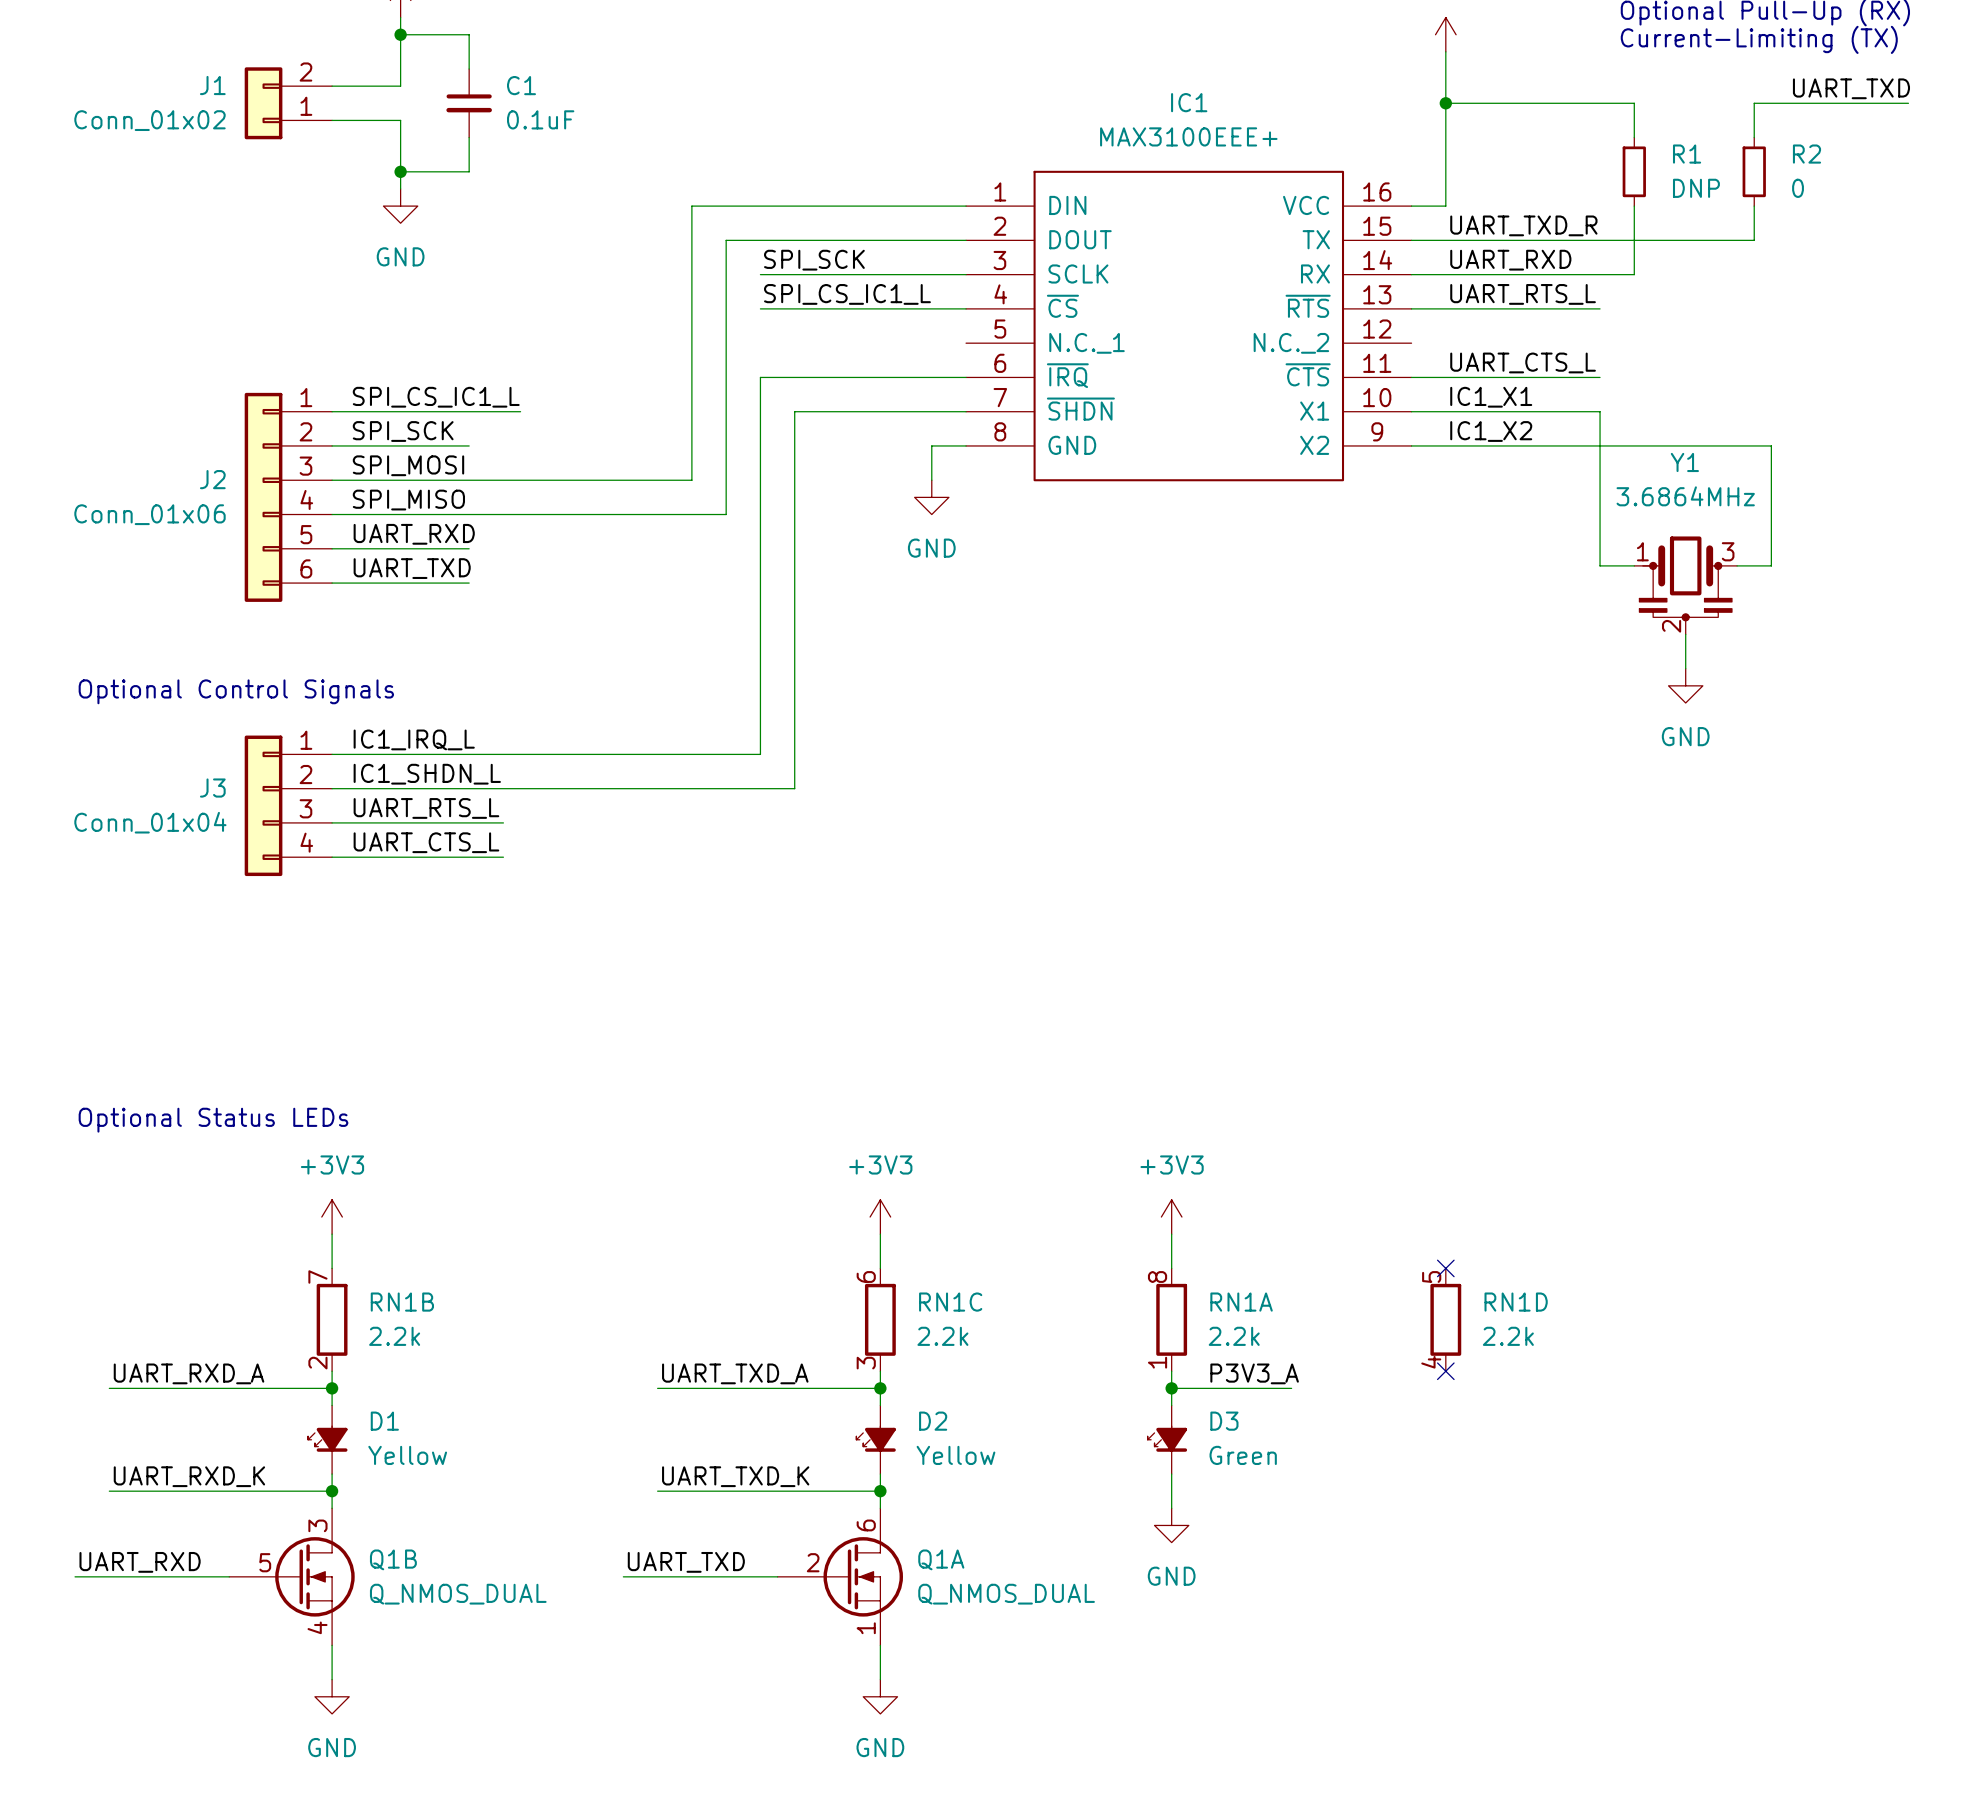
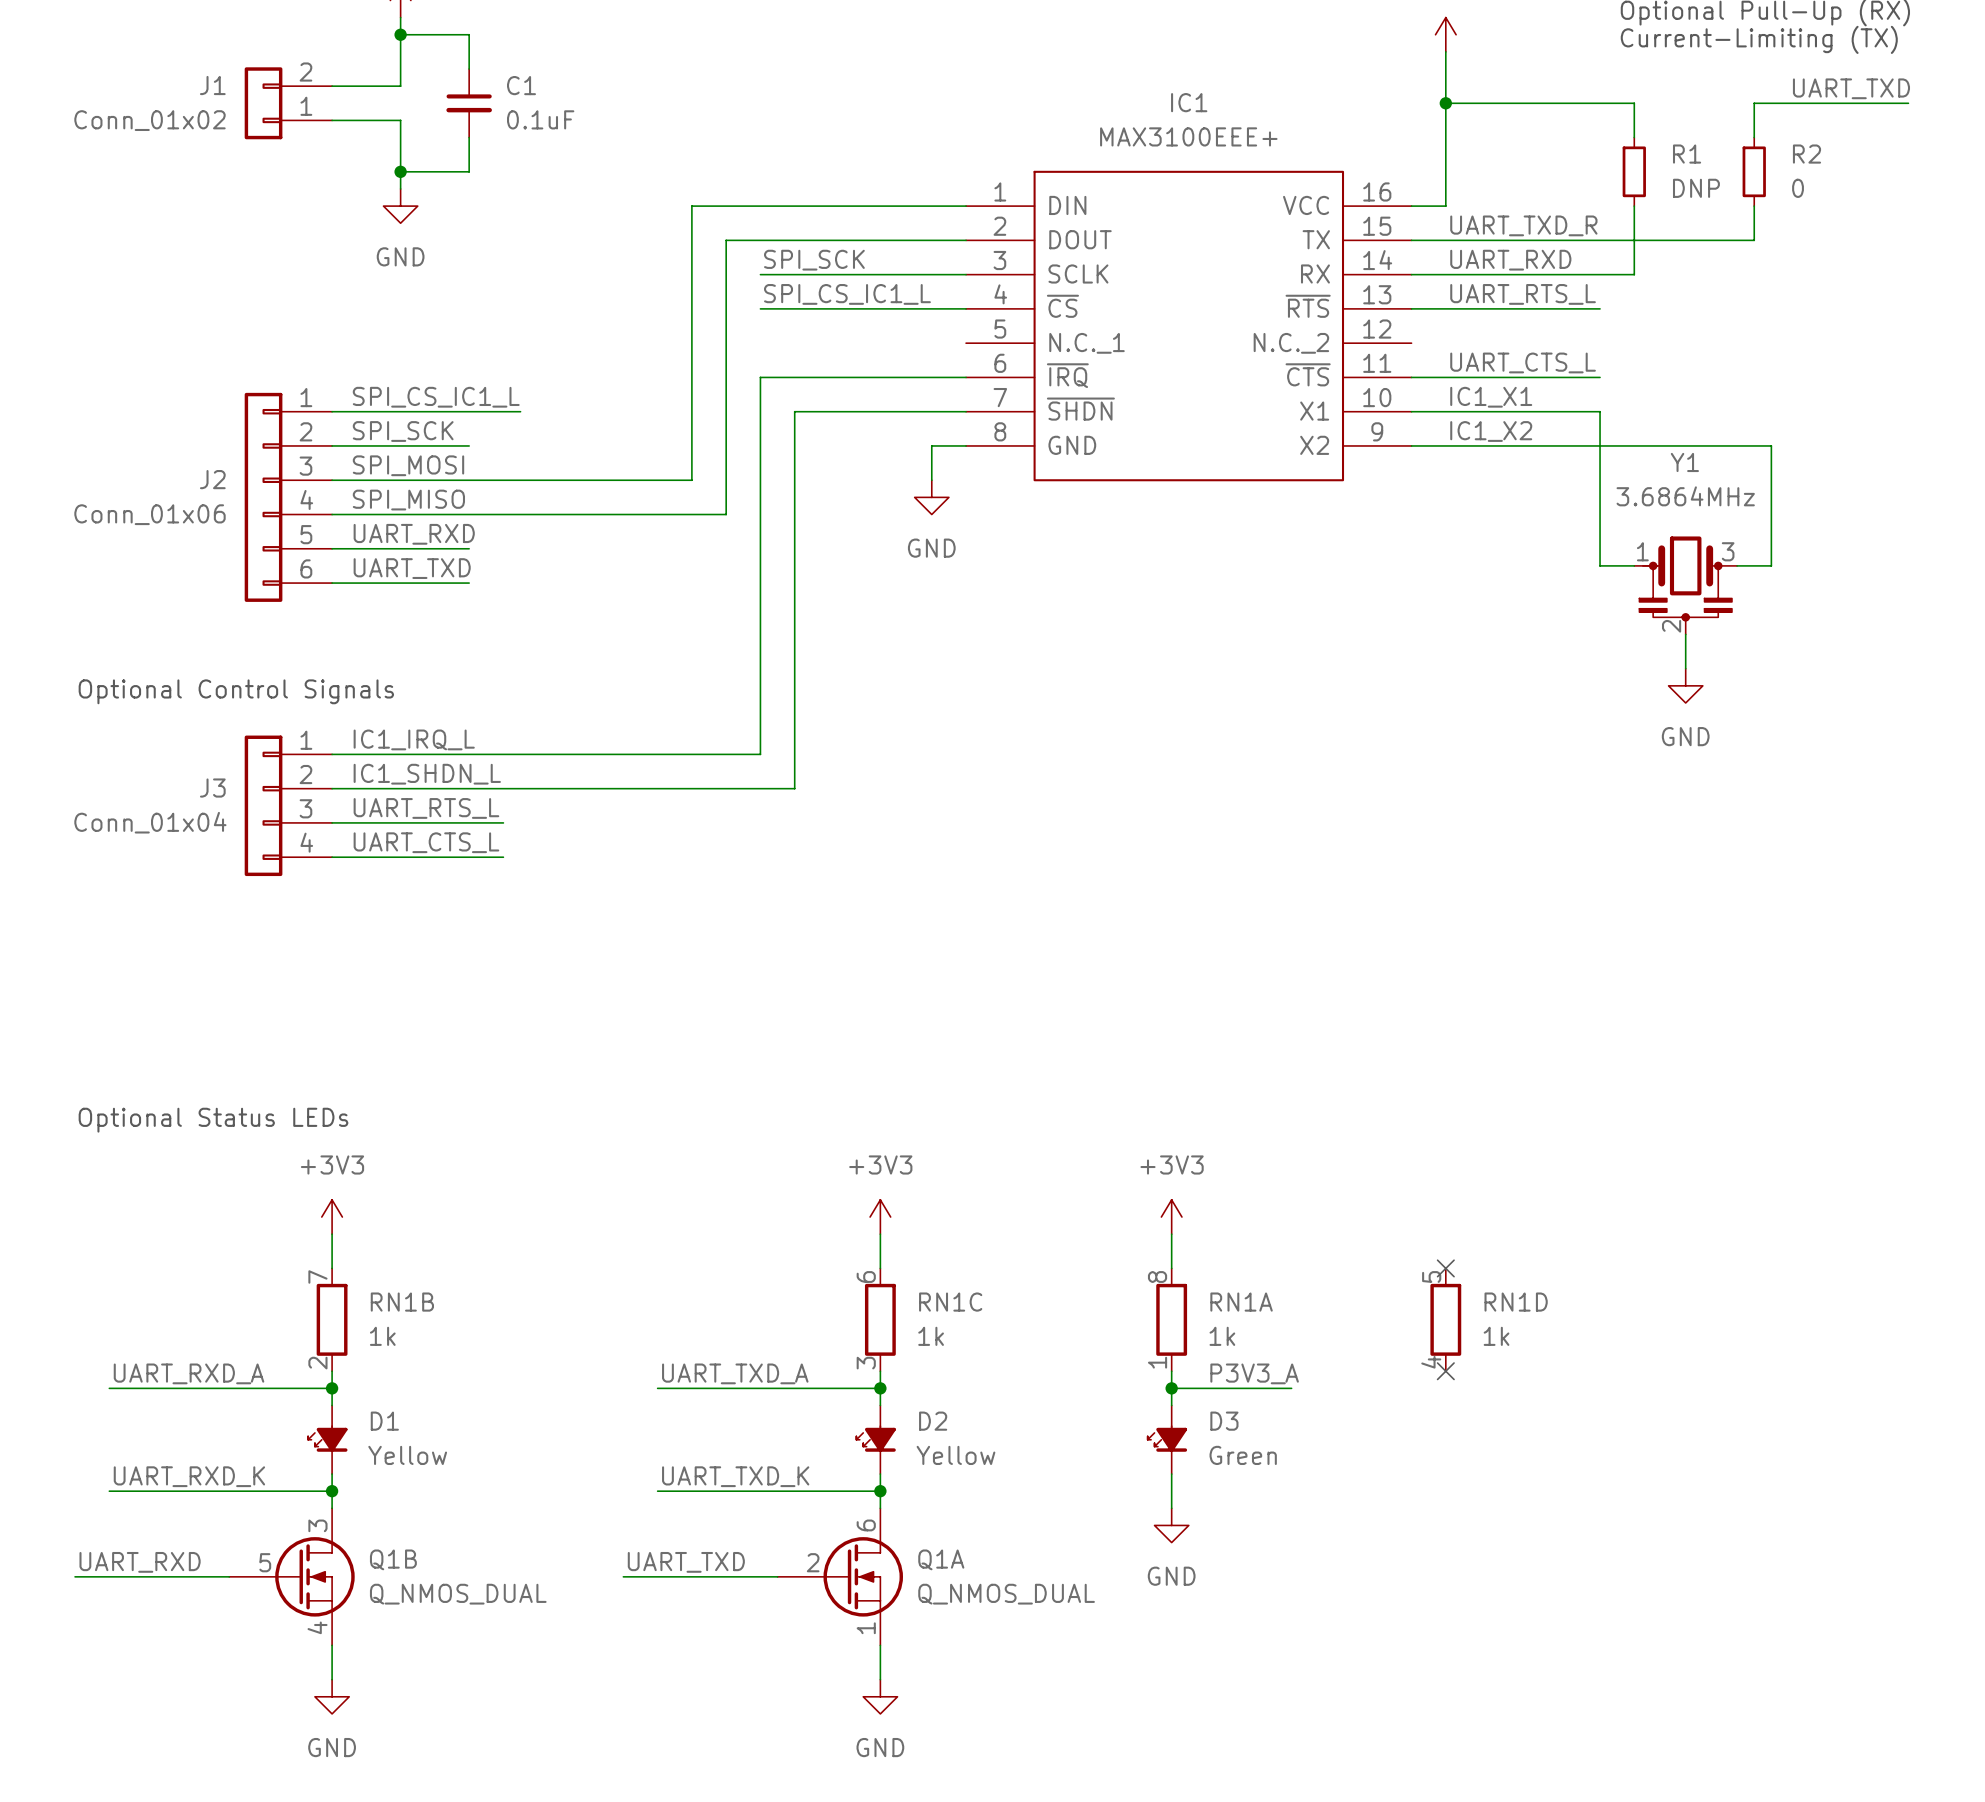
RN1B value: 2.2k (394, 1336) -> 1k (382, 1336)
RN1C value: 2.2k (942, 1336) -> 1k (931, 1336)
RN1A value: 2.2k (1234, 1336) -> 1k (1222, 1336)
RN1D value: 2.2k (1508, 1336) -> 1k (1496, 1336)

